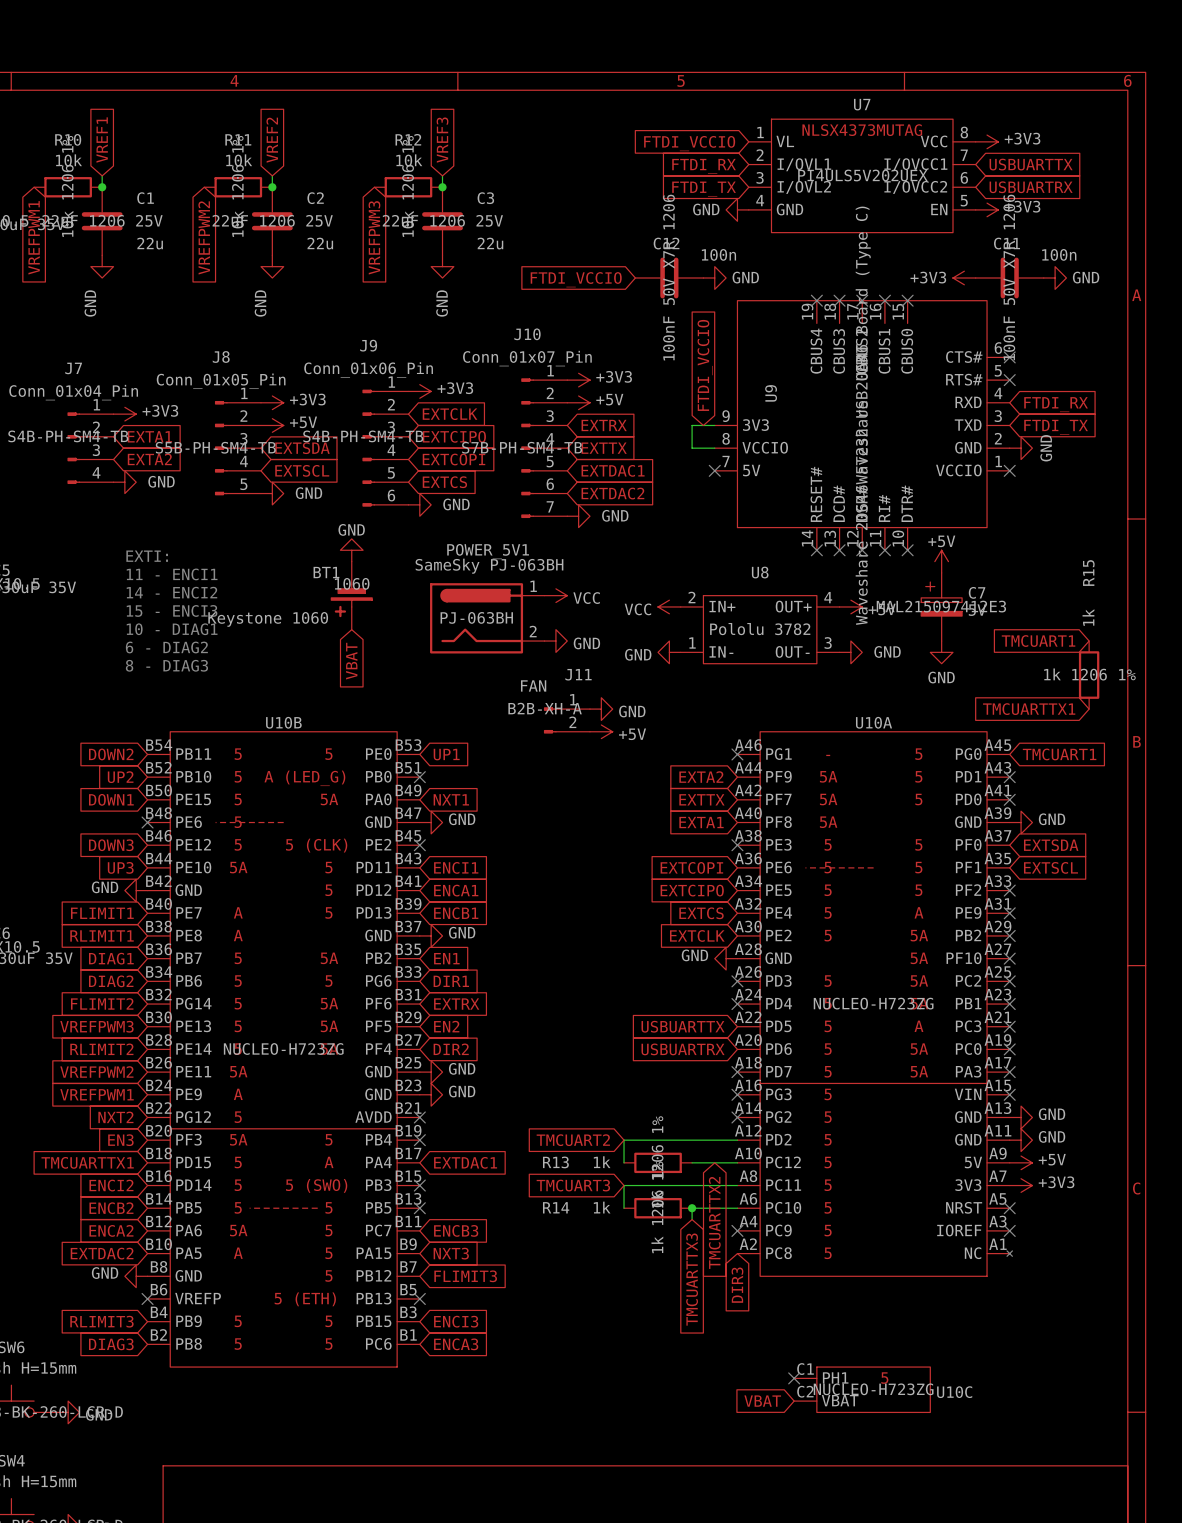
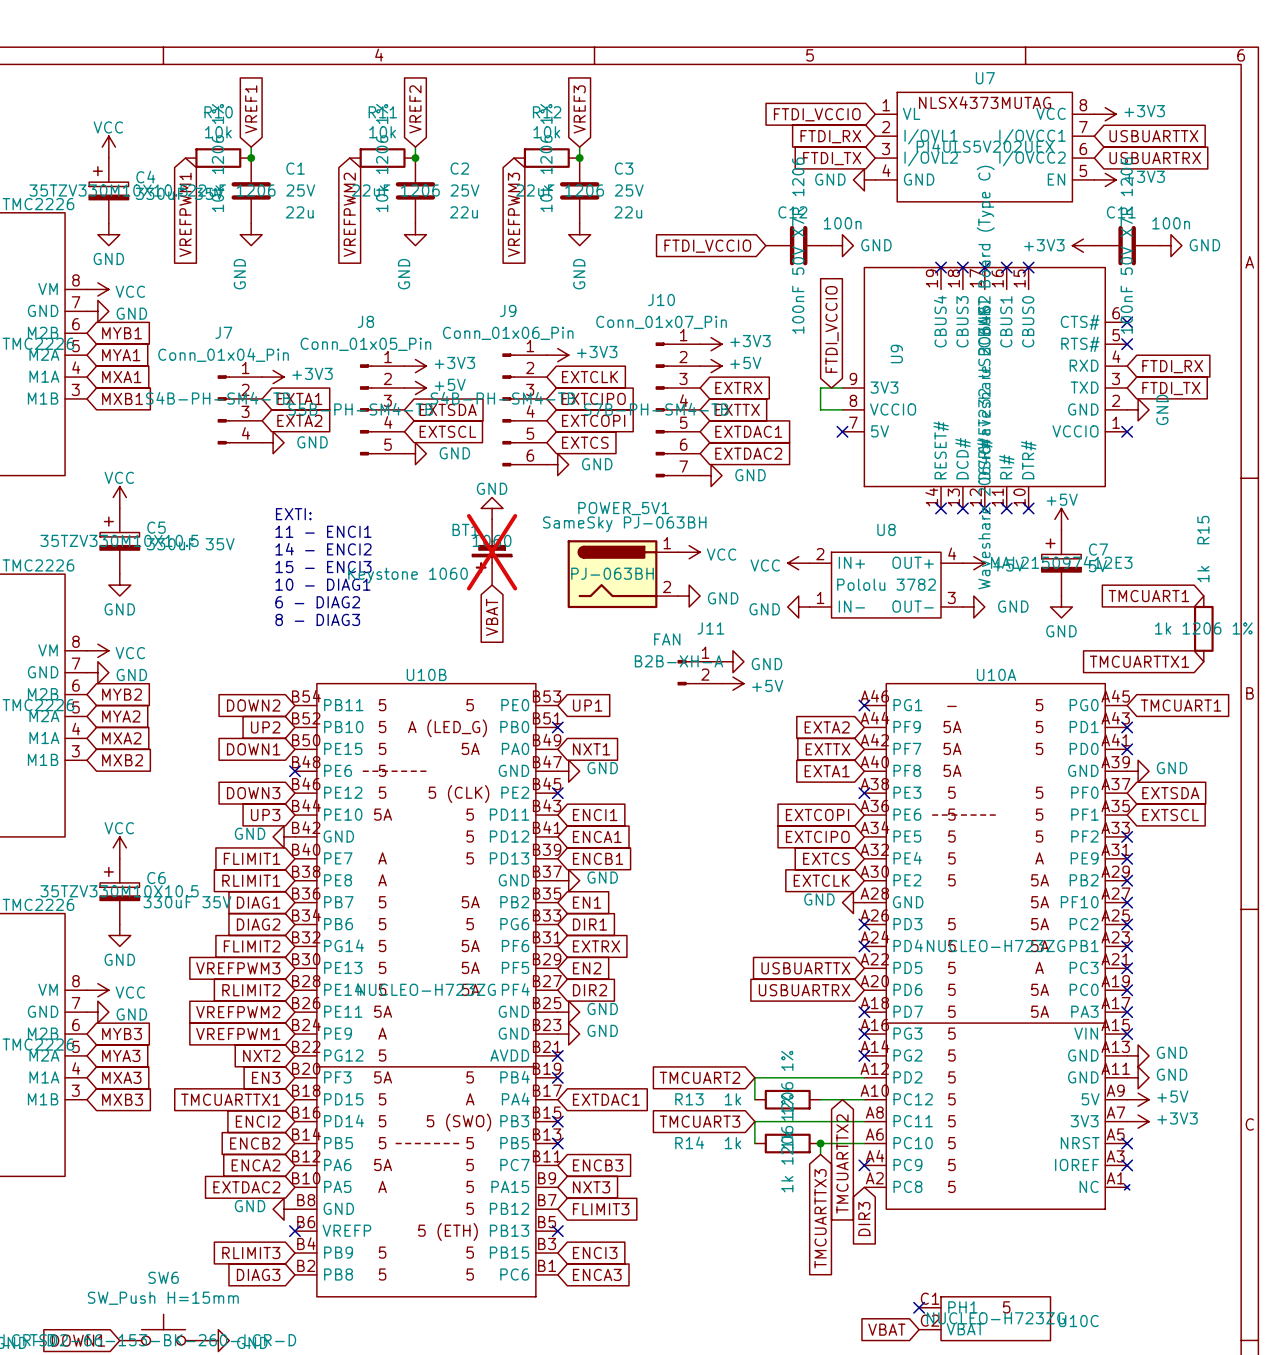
BT1 do-not-place cross: none -> (492, 552)

